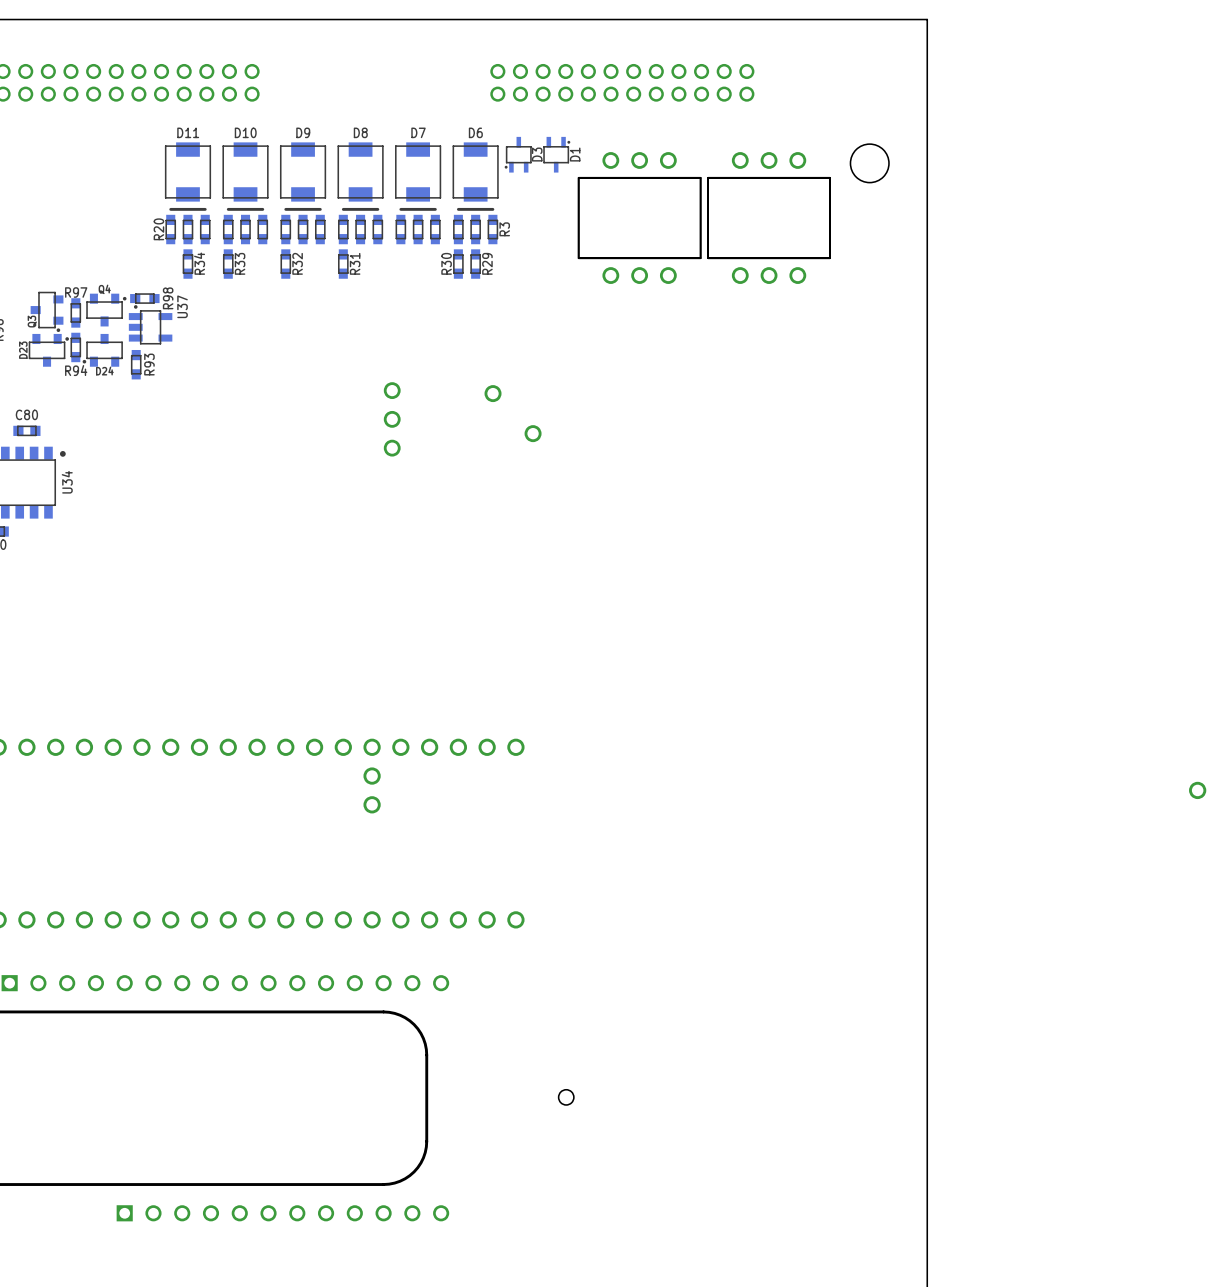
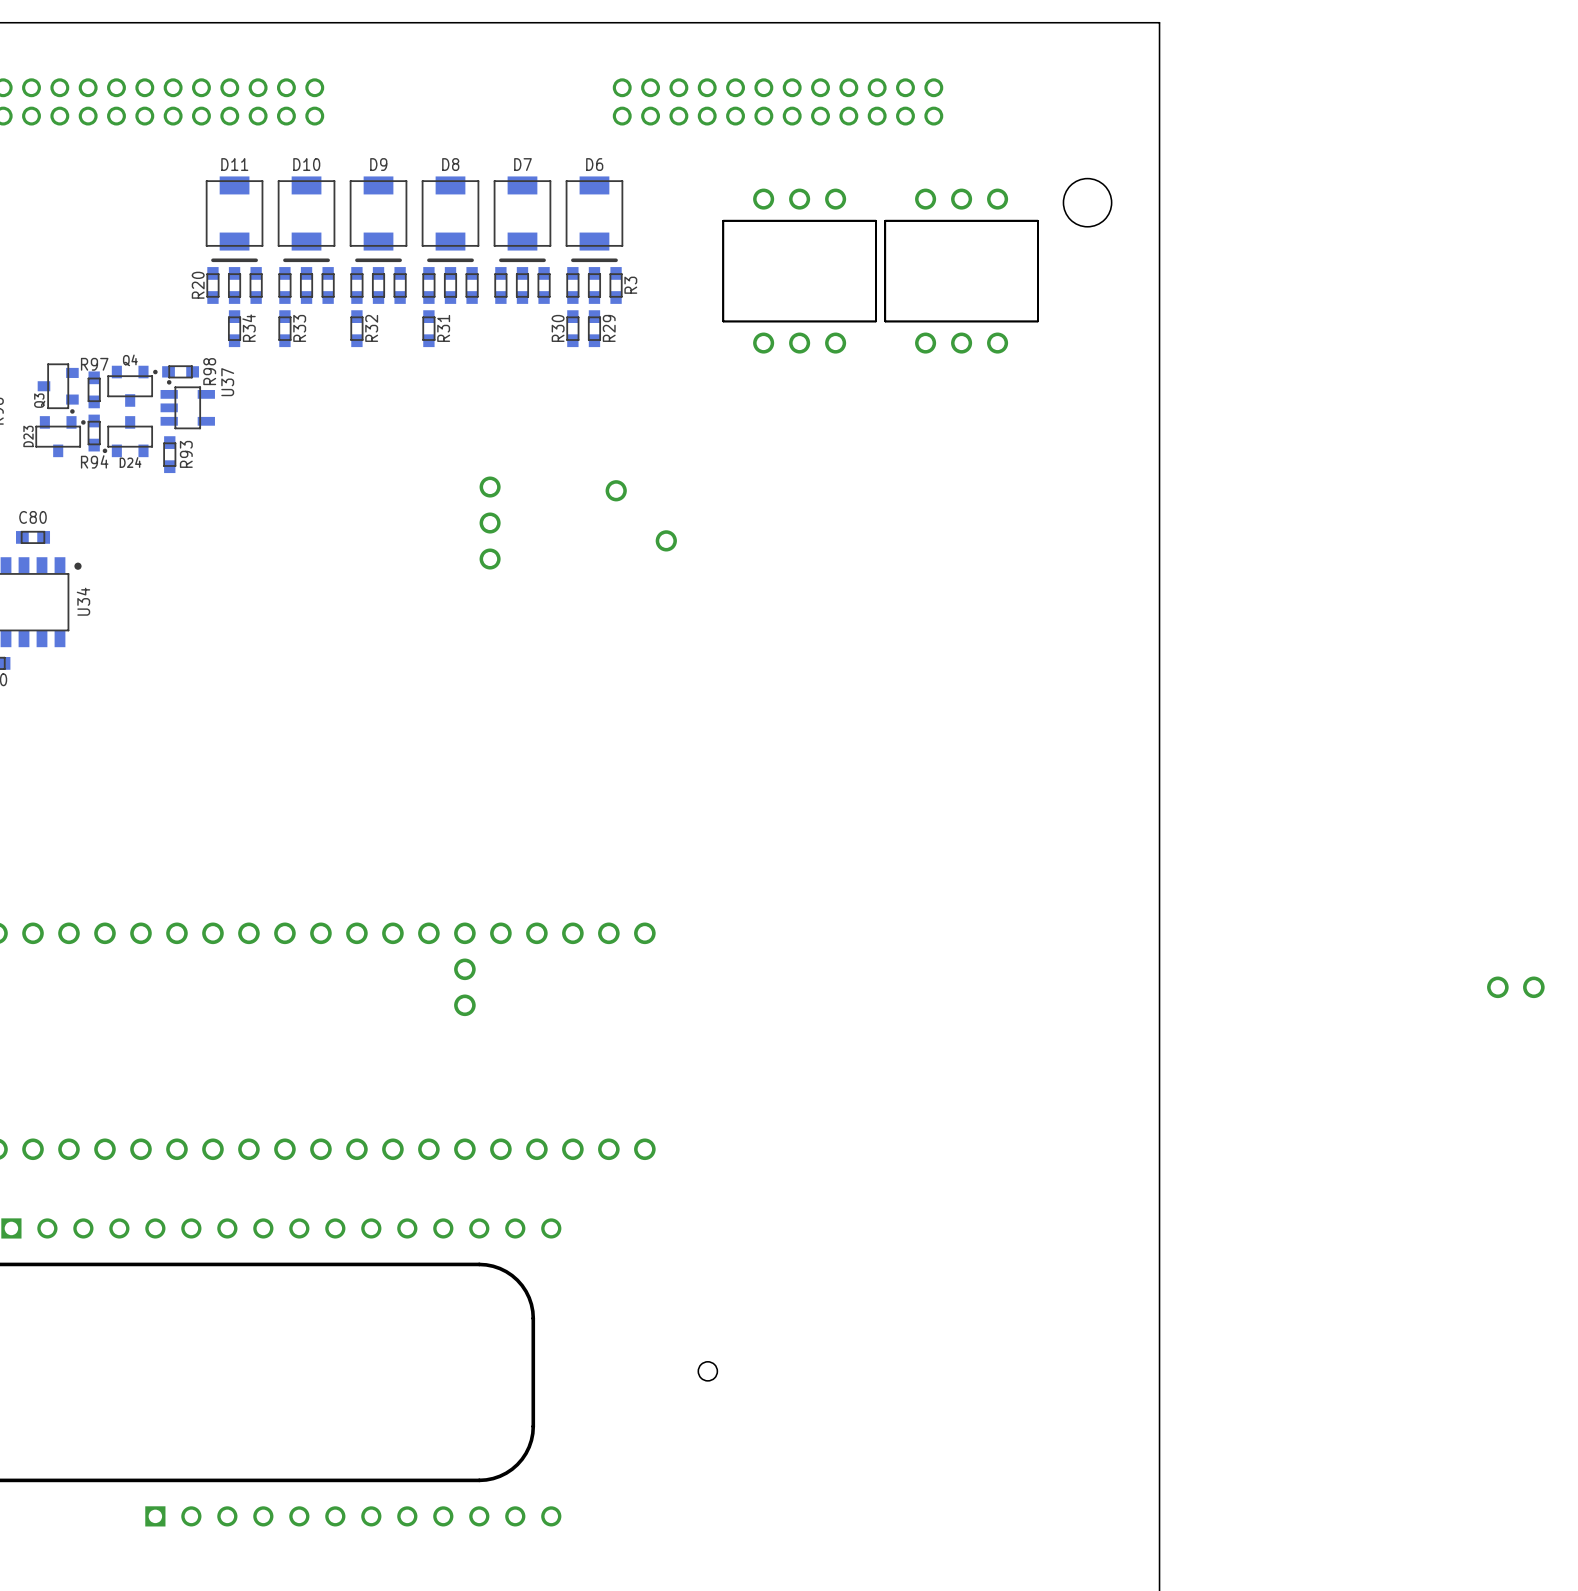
D3: (518, 154) -> none
D1: (556, 154) -> none

